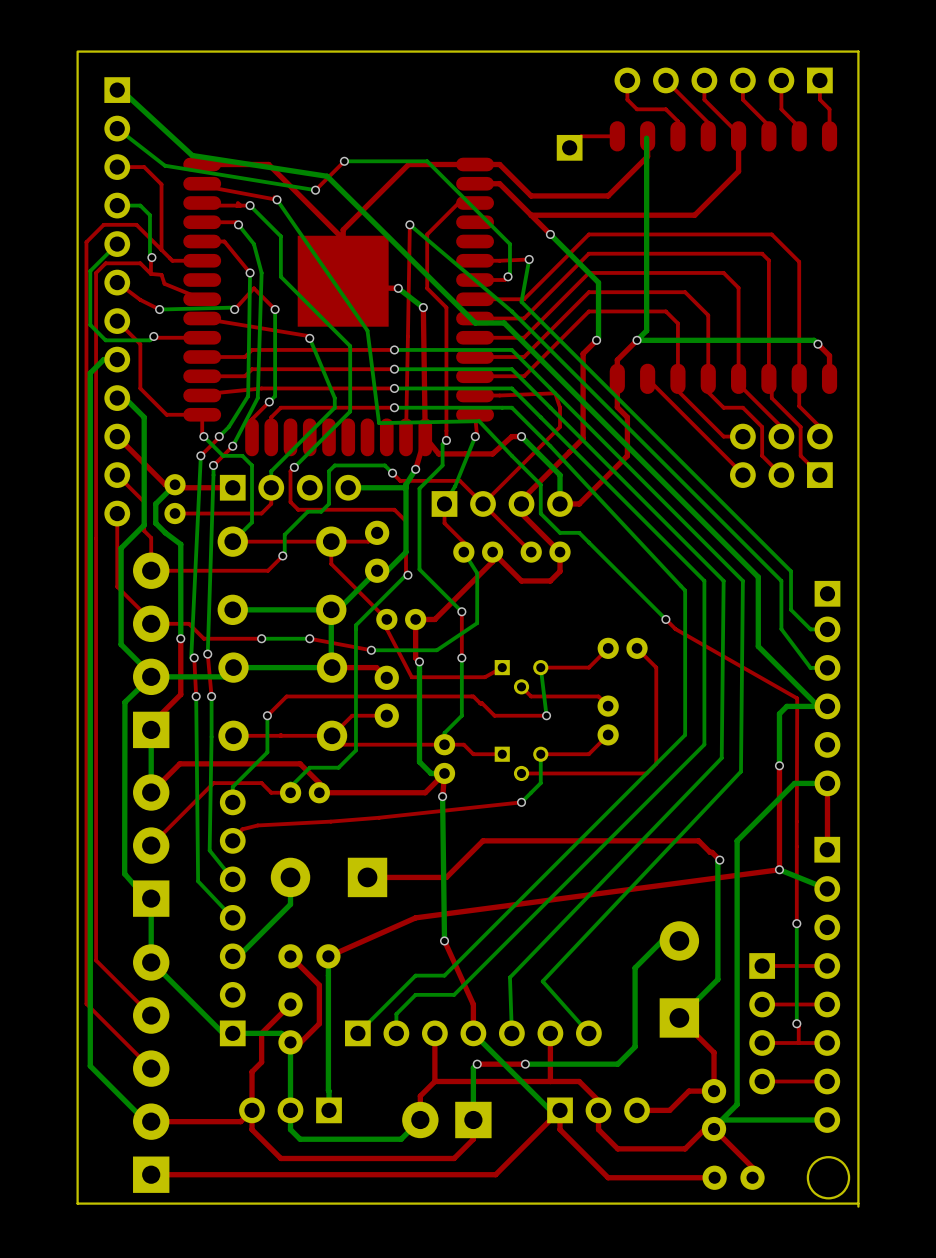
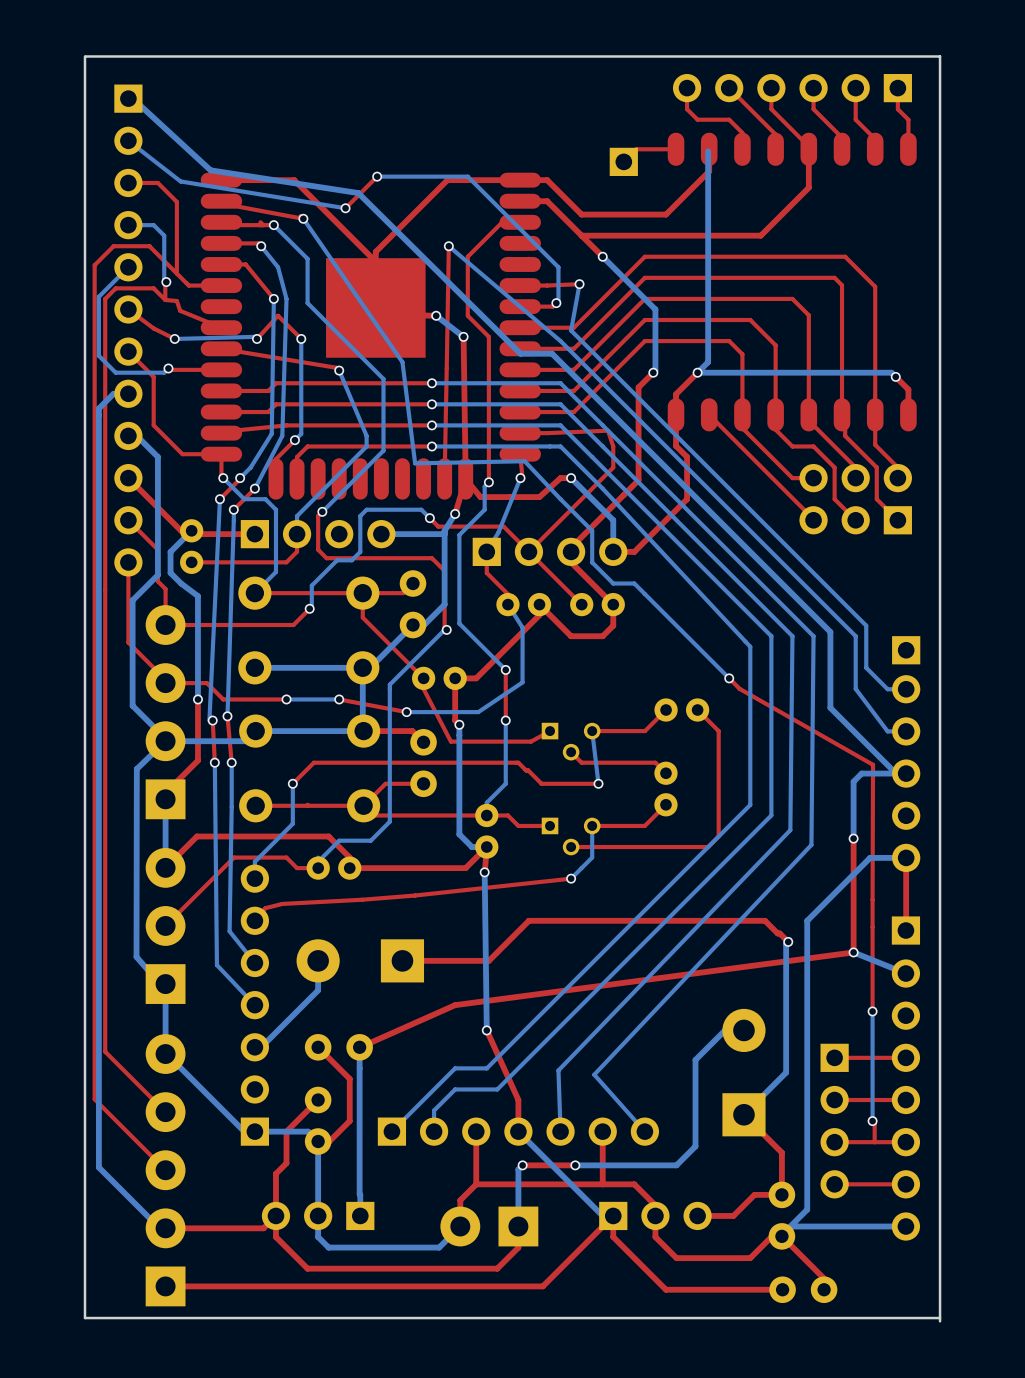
round board edge: [806, 1156, 851, 1200] -> none

